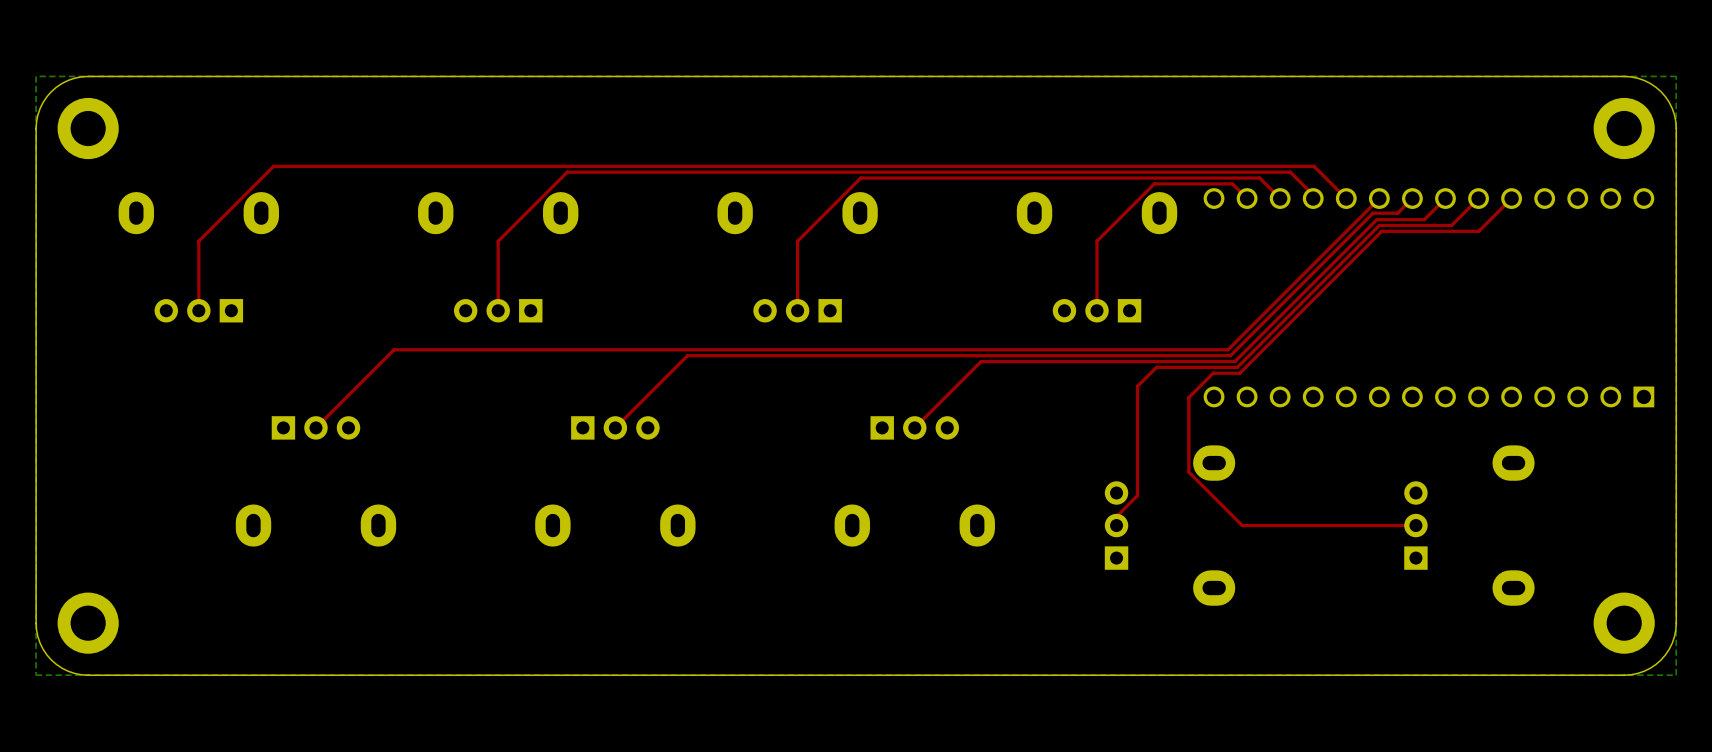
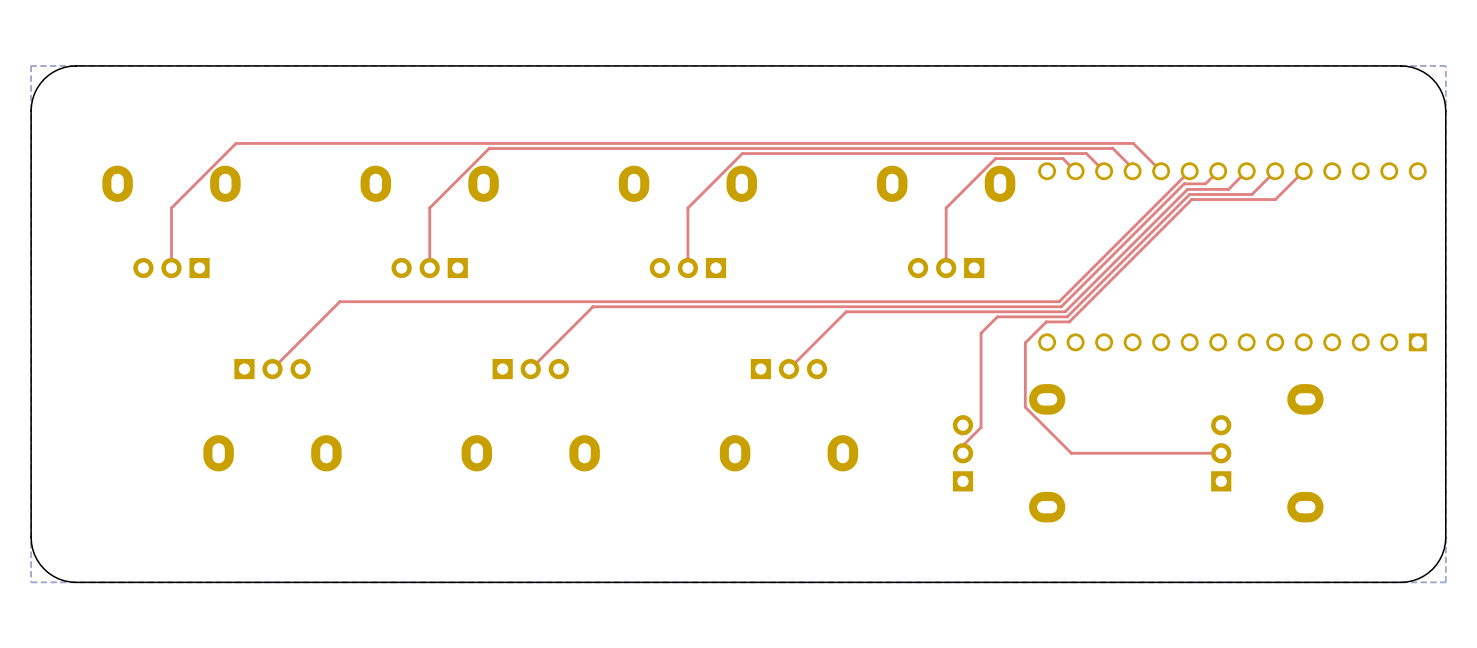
part: (88, 128) -> none
part: (1624, 128) -> none
part: (88, 623) -> none
part: (1624, 623) -> none

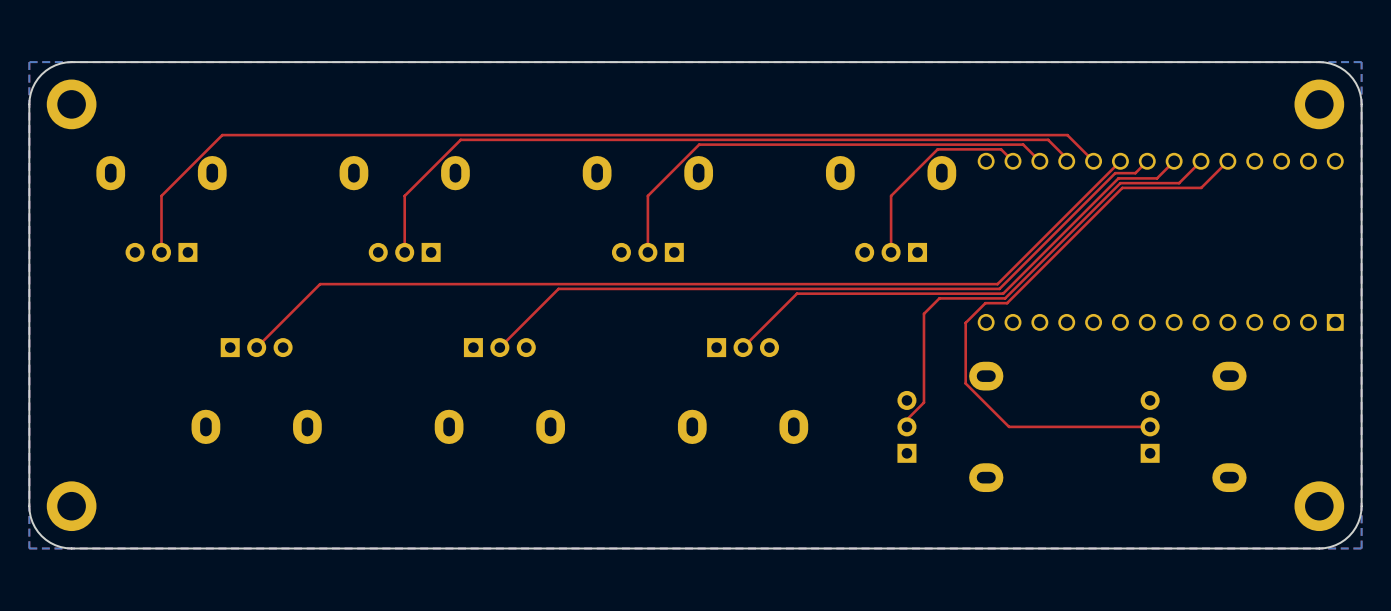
part: none -> (71, 104)
part: none -> (1319, 104)
part: none -> (71, 506)
part: none -> (1319, 506)

